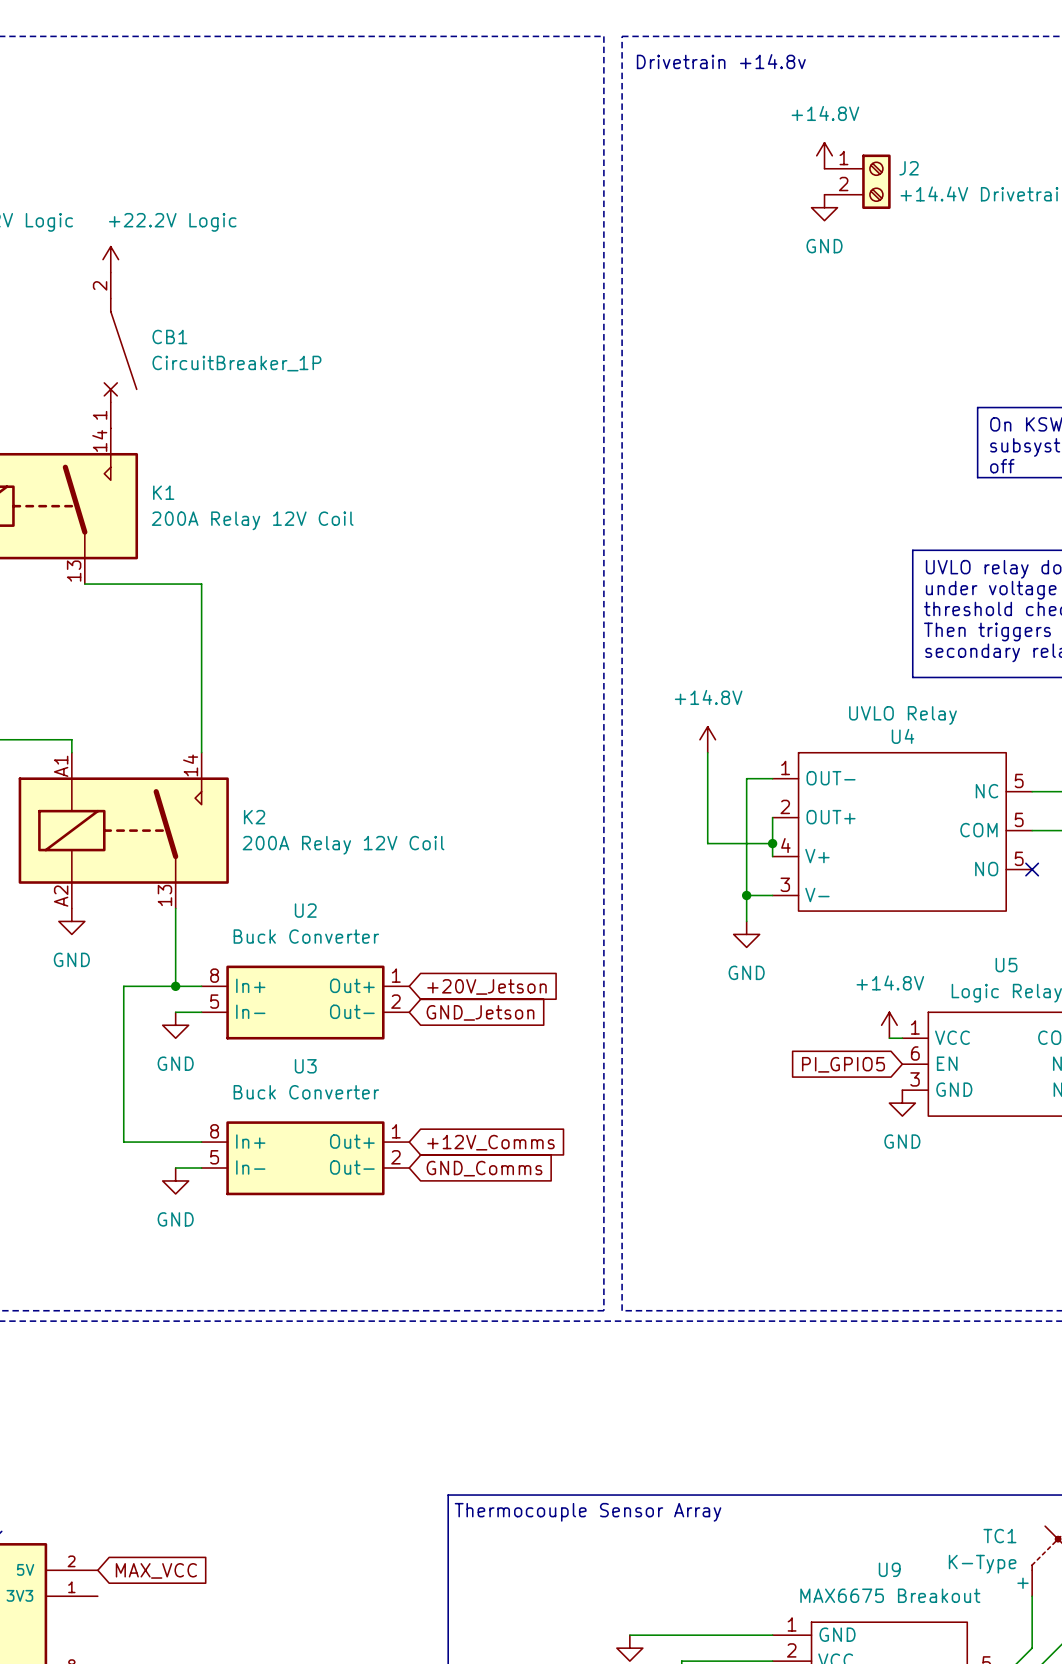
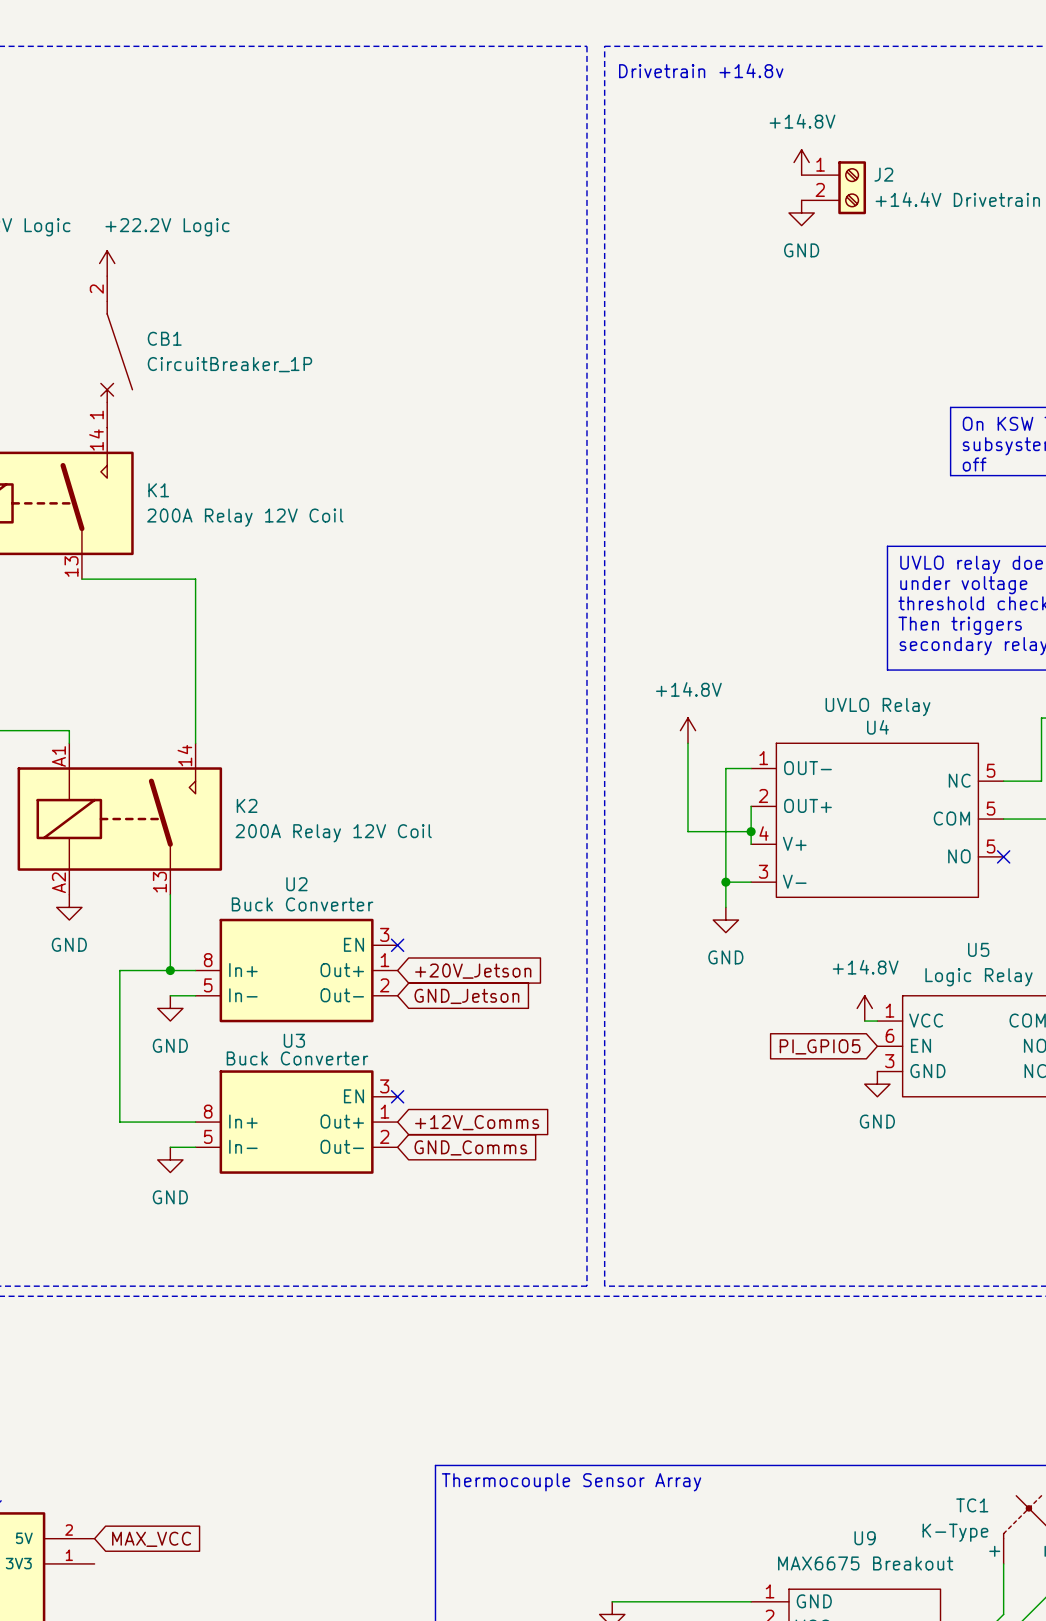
no-connect mark: none -> (397, 945)
U2 symbol: [201, 965, 410, 1040] -> [195, 918, 398, 1023]
no-connect mark: none -> (397, 1096)
U3 symbol: [201, 1121, 410, 1196] -> [195, 1070, 398, 1174]

